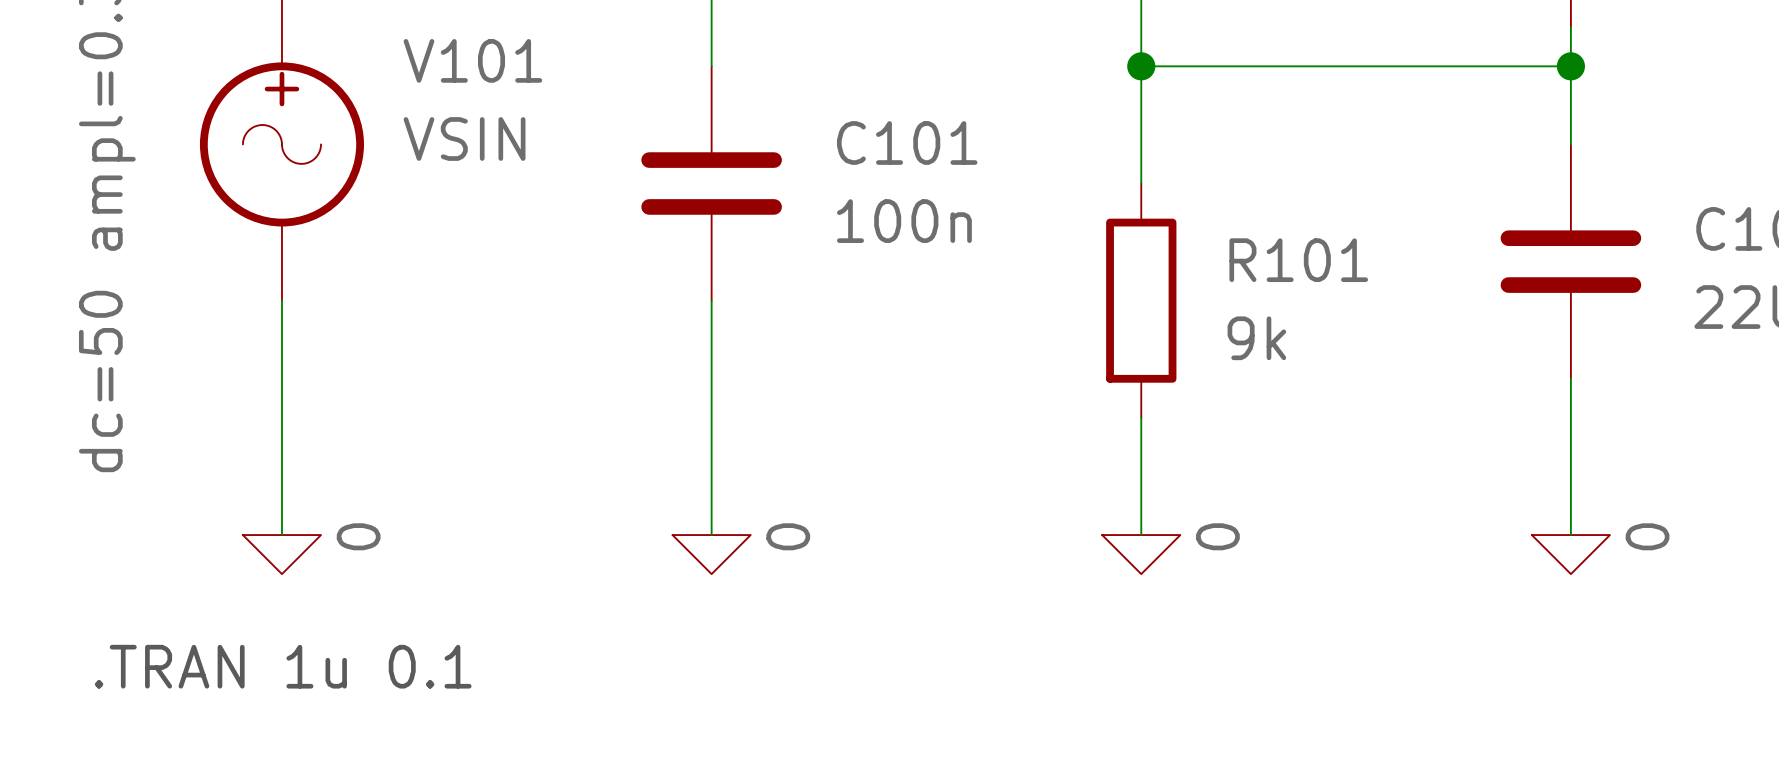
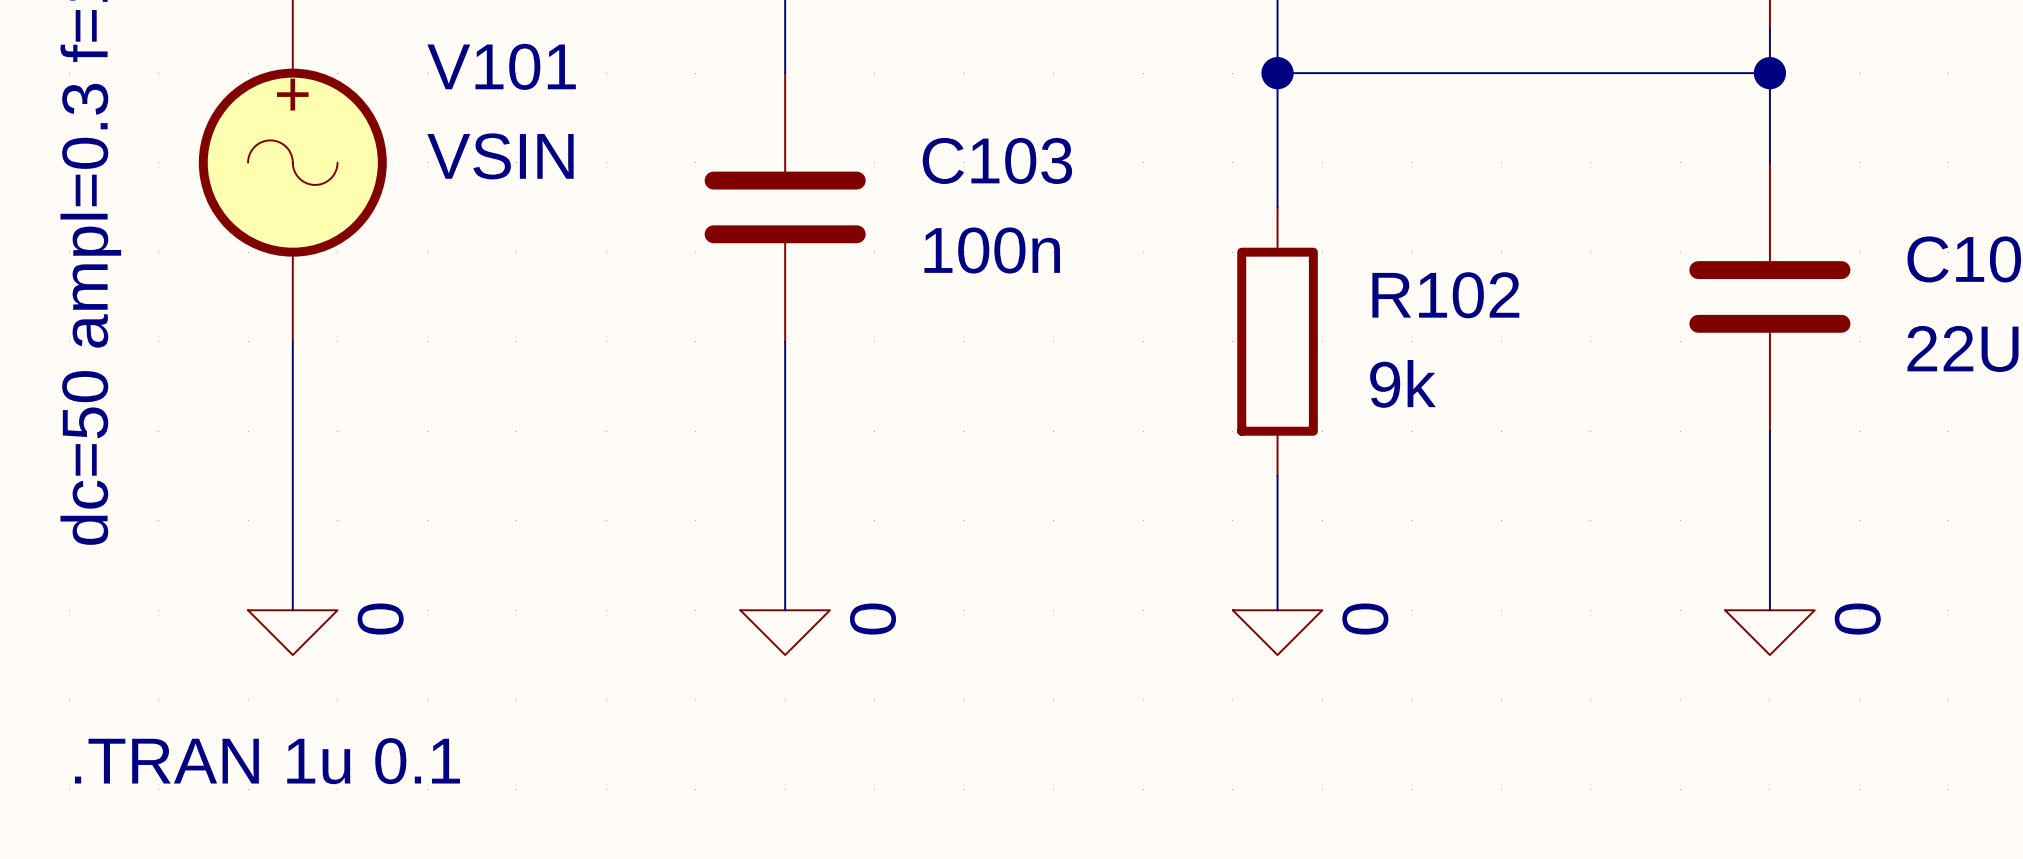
C101 name: C101 (907, 142) -> C103 (997, 160)
R101 name: R101 (1298, 260) -> R102 (1445, 295)

